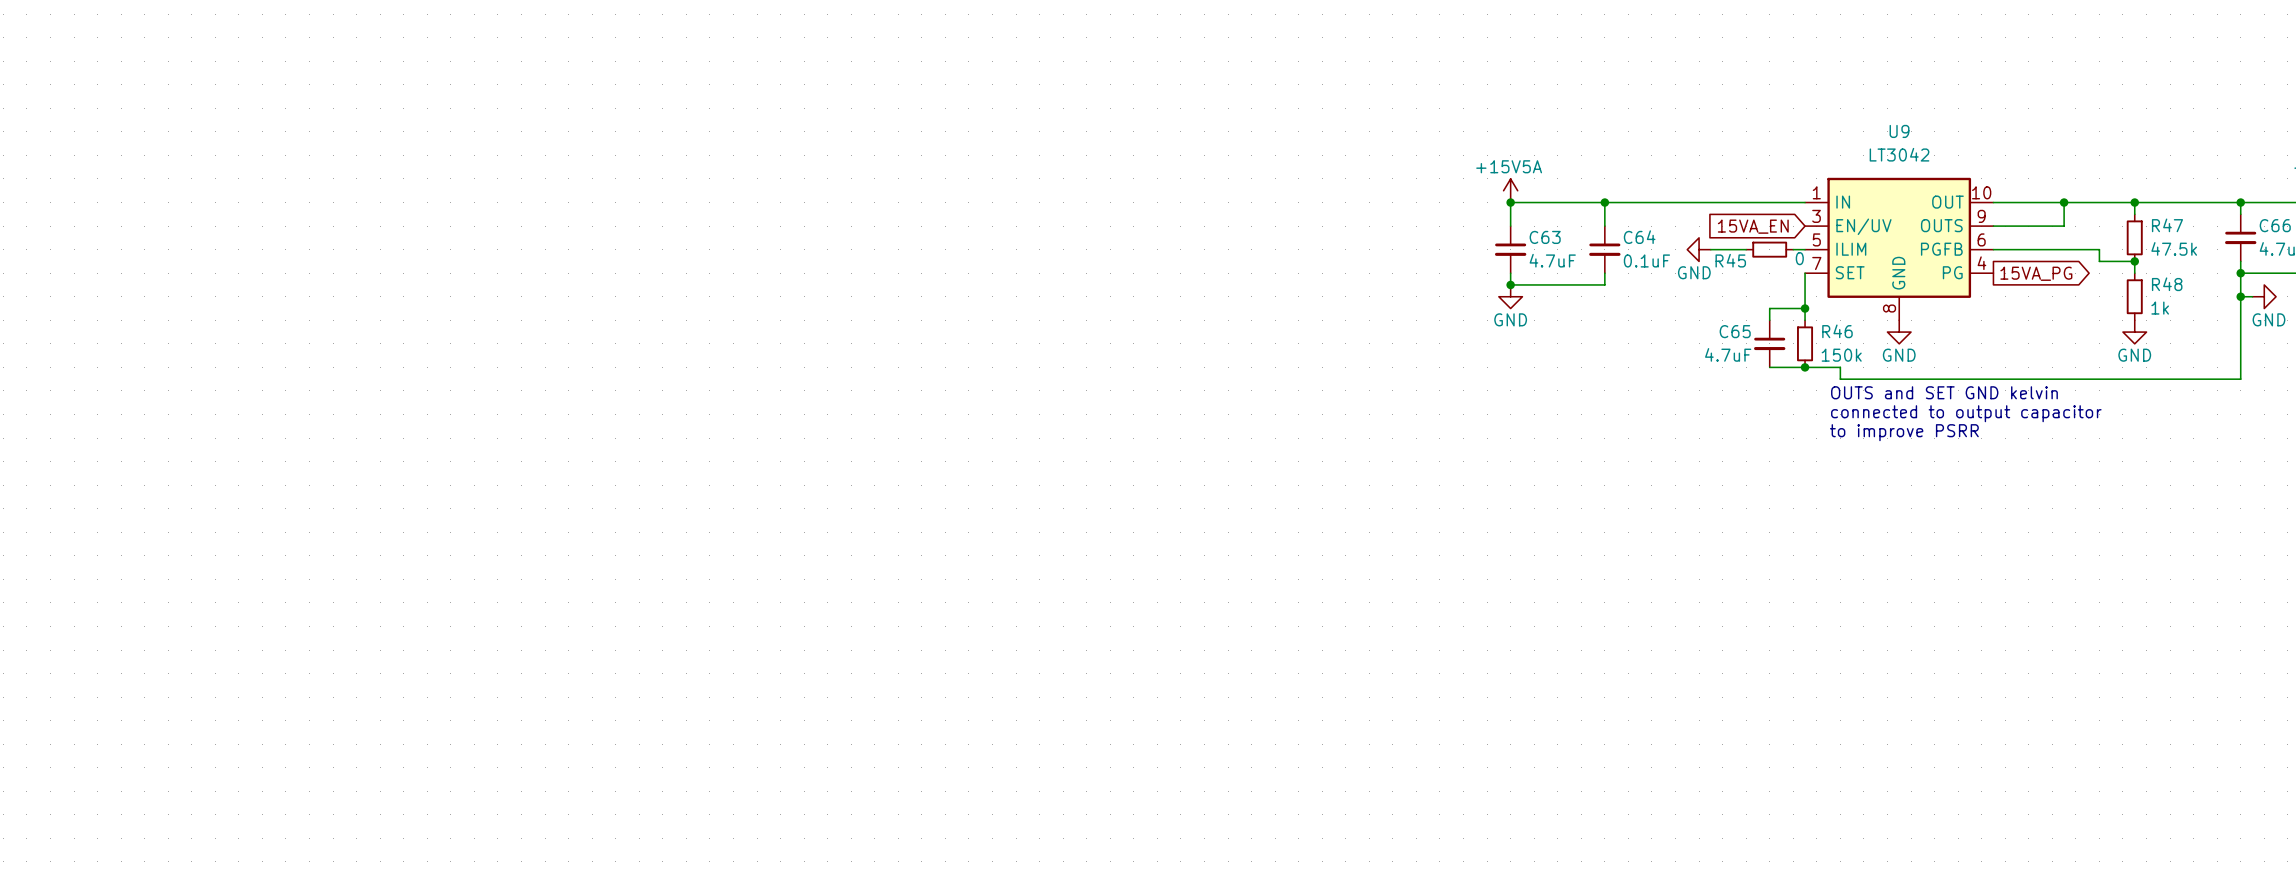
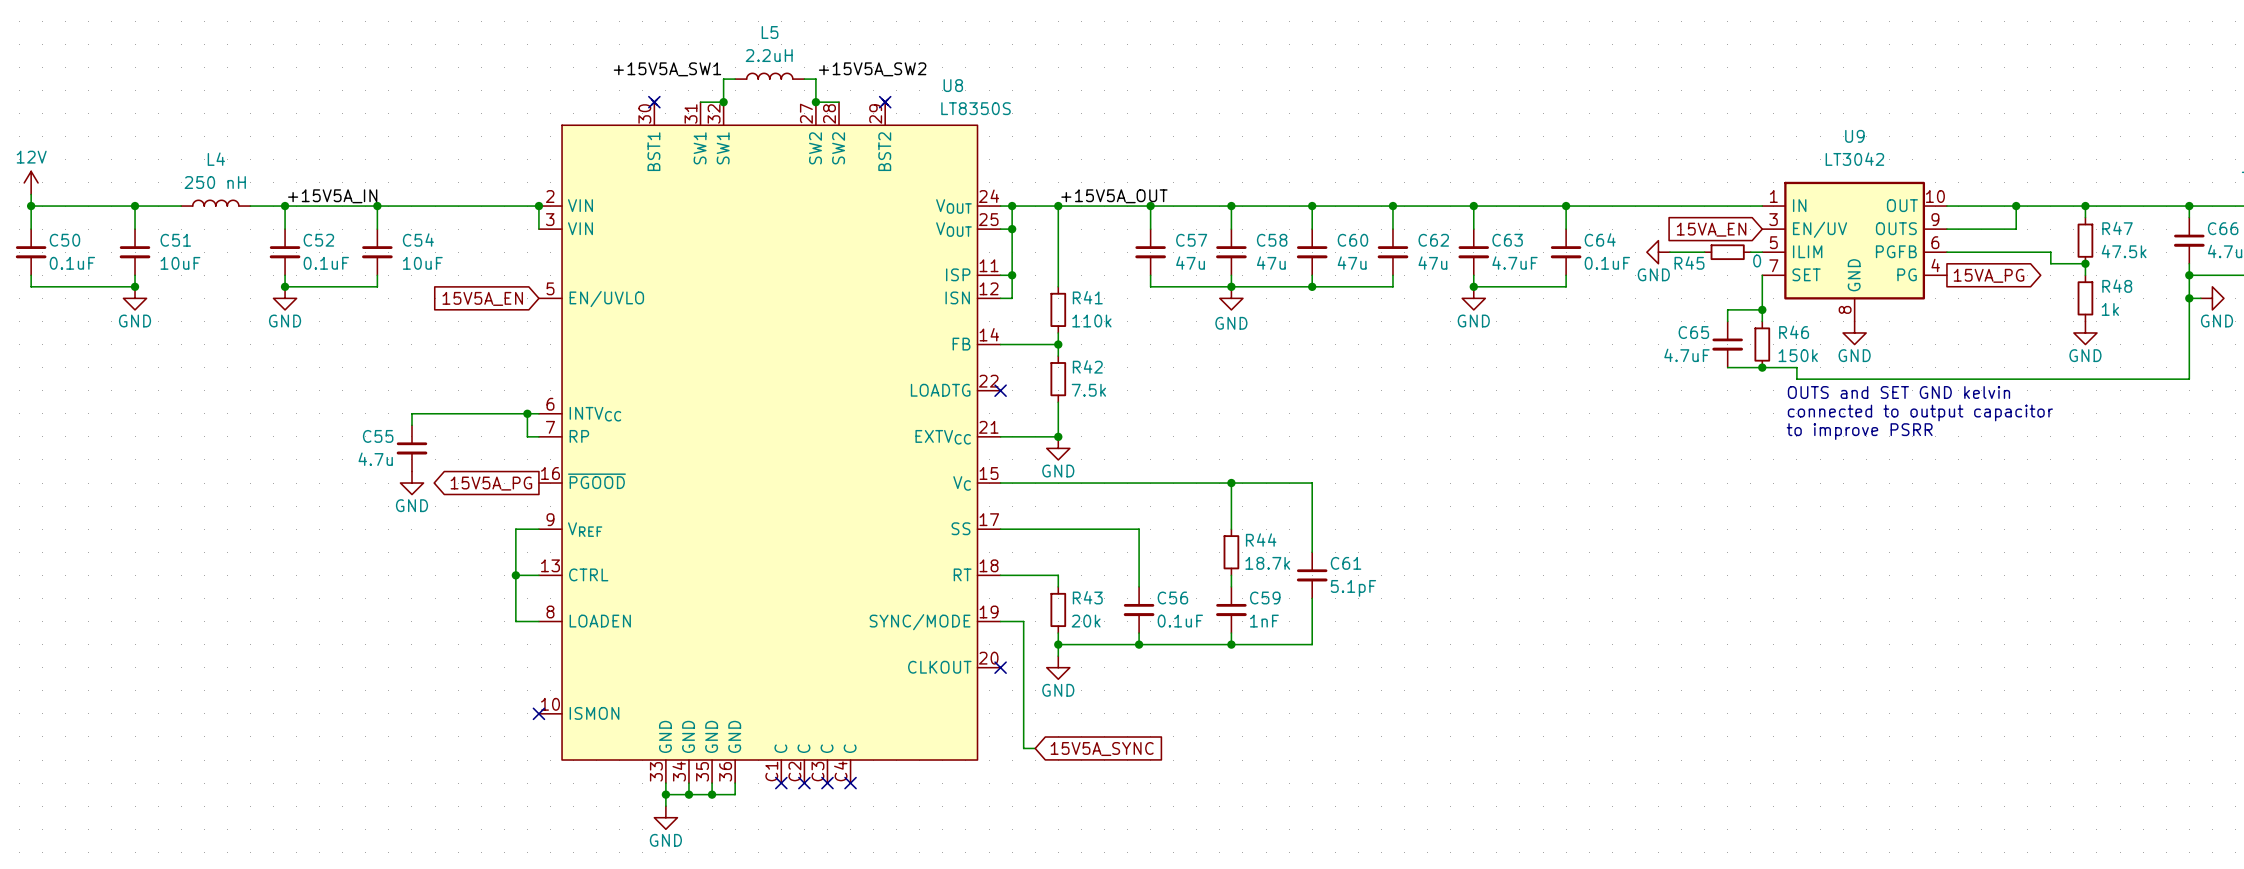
label: none -> +15V5A_SW1 (667, 69)
label: none -> +15V5A_SW2 (872, 69)
L5: none -> 2.2uH (769, 76)
wire: none -> (735, 79) (723, 79) (723, 102) (700, 102)
wire: none -> (804, 79) (815, 79) (815, 102) (839, 102)
no-connect mark: none -> (654, 102)
junction: none -> (723, 102)
junction: none -> (815, 102)
no-connect mark: none -> (885, 102)
power symbol: none -> 12V (31, 182)
wire: none -> (31, 194) (31, 229)
power symbol: +15V5A (1510, 190) -> none
label: none -> +15V5A_IN (332, 196)
label: none -> +15V5A_OUT (1114, 196)
L4: none -> 250 nH (215, 203)
wire: none -> (31, 206) (181, 206)
junction: none -> (31, 206)
wire: none -> (135, 206) (135, 229)
junction: none -> (135, 206)
wire: none -> (250, 206) (538, 206) (538, 229)
wire: none -> (285, 206) (285, 229)
junction: none -> (285, 206)
wire: none -> (377, 206) (377, 229)
junction: none -> (377, 206)
junction: none -> (538, 206)
wire: none -> (1000, 206) (1473, 206)
wire: none -> (1012, 206) (1012, 298) (1000, 298)
junction: none -> (1012, 206)
wire: none -> (1058, 206) (1058, 286)
junction: none -> (1058, 206)
wire: none -> (1150, 206) (1150, 229)
junction: none -> (1150, 206)
wire: none -> (1231, 206) (1231, 229)
junction: none -> (1231, 206)
wire: none -> (1312, 206) (1312, 229)
junction: none -> (1312, 206)
wire: none -> (1392, 206) (1392, 229)
junction: none -> (1392, 206)
wire: none -> (1000, 229) (1012, 229)
junction: none -> (1012, 229)
C50: none -> 0.1uF (31, 252)
C51: none -> 10uF (135, 252)
C52: none -> 0.1uF (285, 252)
C54: none -> 10uF (377, 252)
C57: none -> 47u (1150, 252)
C58: none -> 47u (1231, 252)
C60: none -> 47u (1312, 252)
C62: none -> 47u (1392, 252)
wire: none -> (31, 275) (31, 286) (135, 286) (135, 275)
wire: none -> (285, 275) (285, 286) (377, 286) (377, 275)
wire: none -> (1000, 275) (1012, 275)
junction: none -> (1012, 275)
wire: none -> (1150, 275) (1150, 286) (1392, 286) (1392, 275)
wire: none -> (1231, 275) (1231, 286)
wire: none -> (1312, 275) (1312, 286)
junction: none -> (135, 286)
junction: none -> (285, 286)
junction: none -> (1231, 286)
junction: none -> (1312, 286)
power symbol: none -> GND (135, 298)
power symbol: none -> GND (285, 298)
power symbol: none -> GND (1231, 298)
global label: none -> 15V5A_EN (482, 298)
R41: none -> 110k (1058, 309)
wire: none -> (1058, 332) (1058, 356)
wire: none -> (1000, 344) (1058, 344)
junction: none -> (1058, 344)
R42: none -> 7.5k (1058, 379)
no-connect mark: none -> (1000, 390)
wire: none -> (1058, 402) (1058, 436) (1000, 436)
wire: none -> (527, 413) (527, 436) (538, 436)
junction: none -> (527, 413)
wire: none -> (538, 413) (411, 413) (411, 425)
junction: none -> (1058, 436)
U8: none -> LT8350S (769, 441)
C55: none -> 4.7u (411, 448)
power symbol: none -> GND (1058, 448)
power symbol: none -> GND (411, 483)
global label: none -> 15V5A_PG (491, 483)
wire: none -> (1000, 483) (1312, 483) (1312, 552)
wire: none -> (1231, 483) (1231, 529)
junction: none -> (1231, 483)
wire: none -> (538, 529) (515, 529) (515, 621) (538, 621)
wire: none -> (1000, 529) (1139, 529) (1139, 586)
R44: none -> 18.7k (1231, 552)
wire: none -> (515, 575) (538, 575)
junction: none -> (515, 575)
wire: none -> (1000, 575) (1058, 575) (1058, 586)
wire: none -> (1231, 575) (1231, 586)
C61: none -> 5.1pF (1312, 575)
wire: none -> (1312, 598) (1312, 644) (1058, 644)
R43: none -> 20k (1058, 609)
C56: none -> 0.1uF (1139, 609)
C59: none -> 1nF (1231, 609)
wire: none -> (1000, 621) (1023, 621) (1023, 748) (1035, 748)
wire: none -> (1058, 633) (1058, 656)
wire: none -> (1139, 633) (1139, 644)
wire: none -> (1231, 633) (1231, 644)
junction: none -> (1058, 644)
junction: none -> (1139, 644)
junction: none -> (1231, 644)
no-connect mark: none -> (1000, 667)
power symbol: none -> GND (1058, 667)
no-connect mark: none -> (538, 713)
global label: none -> 15V5A_SYNC (1102, 749)
wire: none -> (665, 783) (665, 806)
wire: none -> (688, 783) (688, 794)
wire: none -> (712, 783) (712, 794)
wire: none -> (735, 783) (735, 794) (665, 794)
no-connect mark: none -> (781, 783)
no-connect mark: none -> (804, 783)
no-connect mark: none -> (827, 783)
no-connect mark: none -> (850, 783)
junction: none -> (665, 794)
junction: none -> (688, 794)
junction: none -> (712, 794)
power symbol: none -> GND (665, 817)

